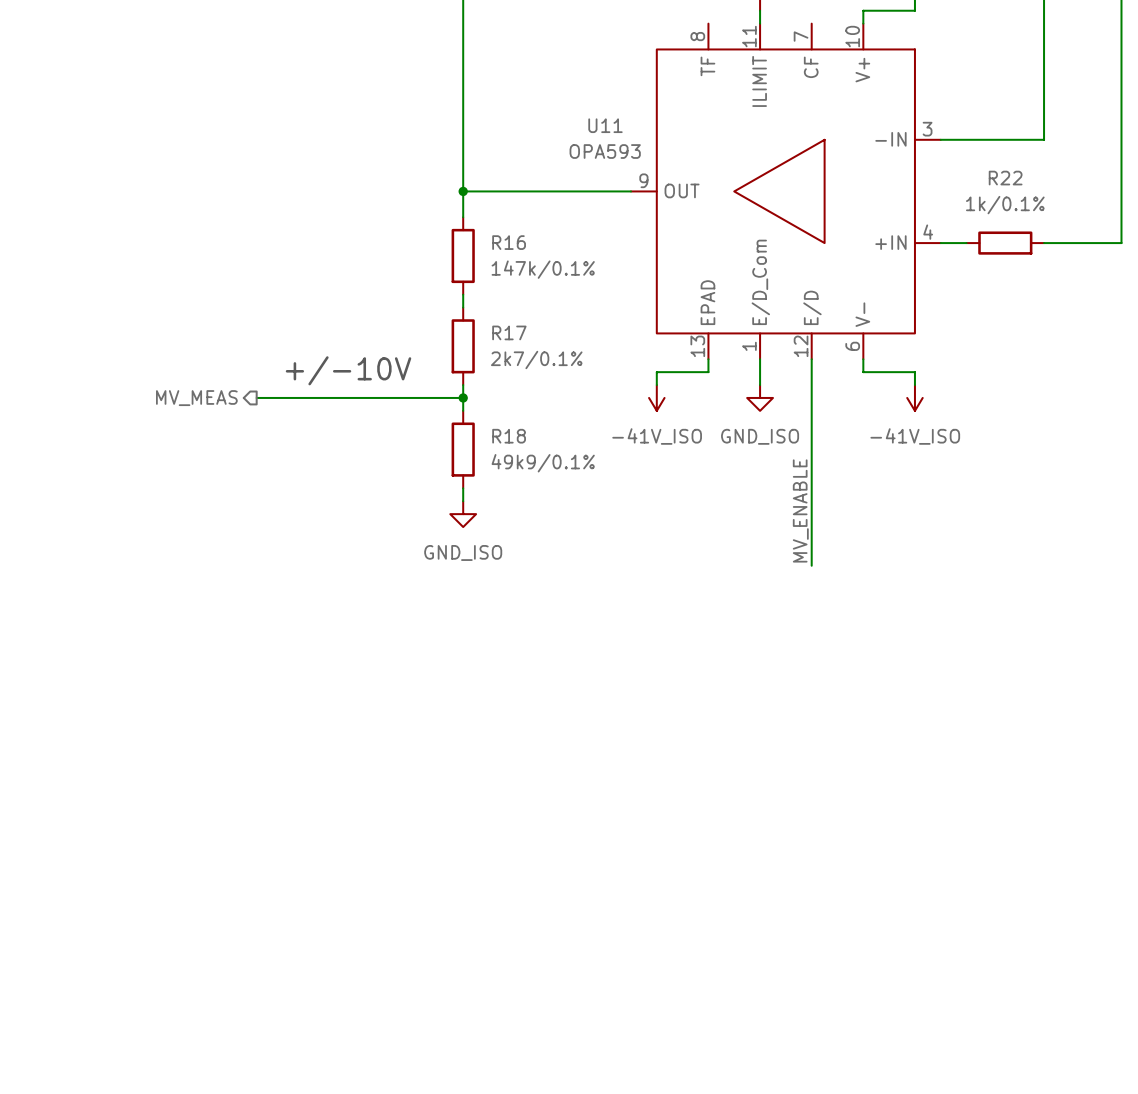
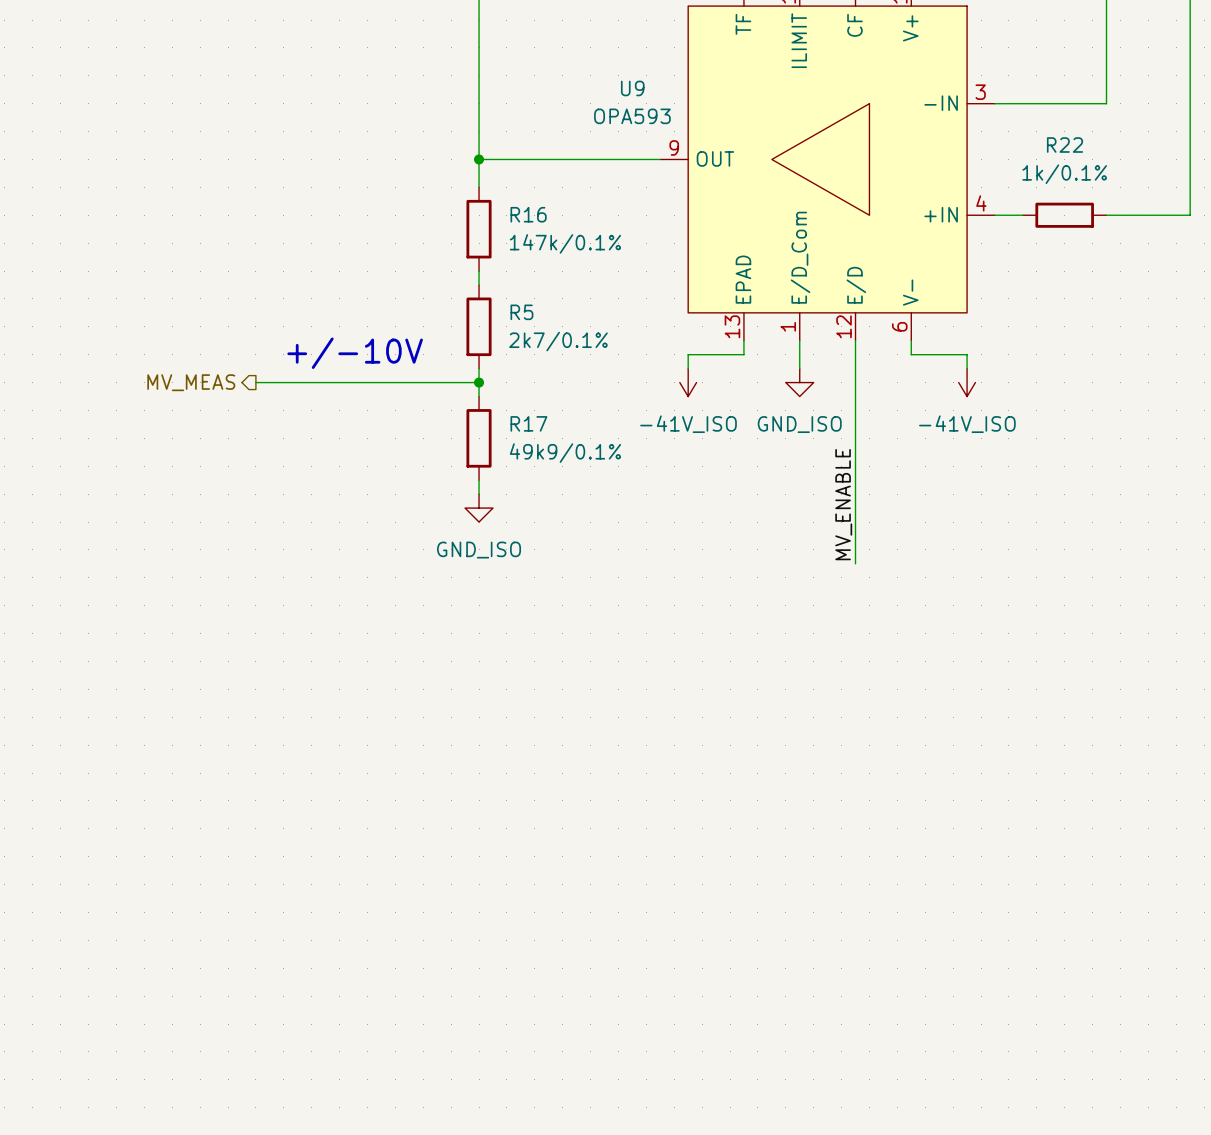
U11 name: U11 (605, 125) -> U9 (632, 88)
R17 name: R17 (509, 332) -> R5 (521, 312)
R18 name: R18 (509, 436) -> R17 (528, 423)

